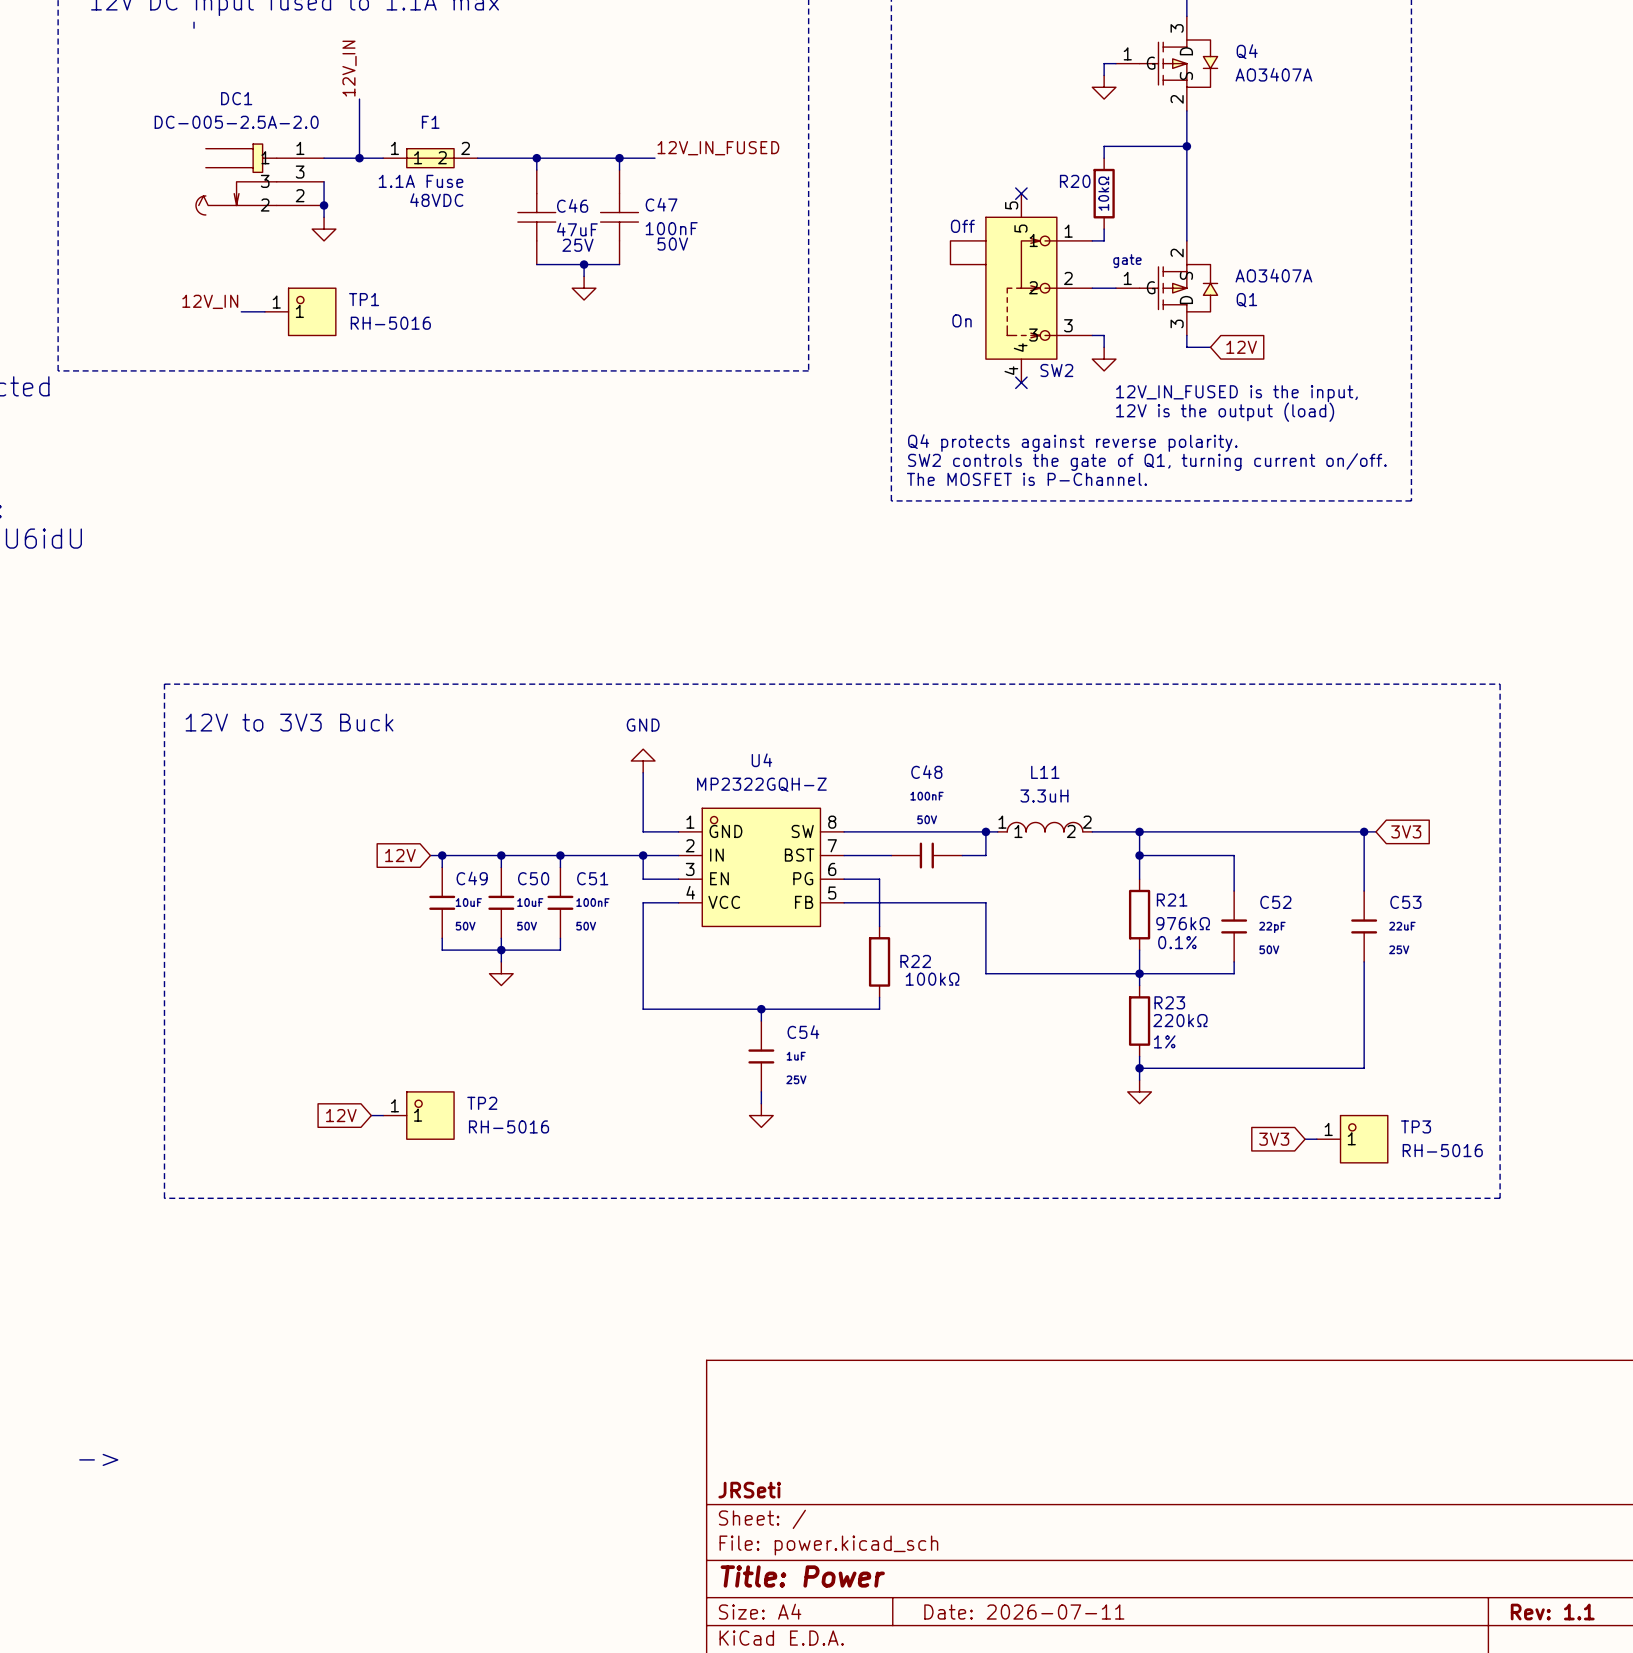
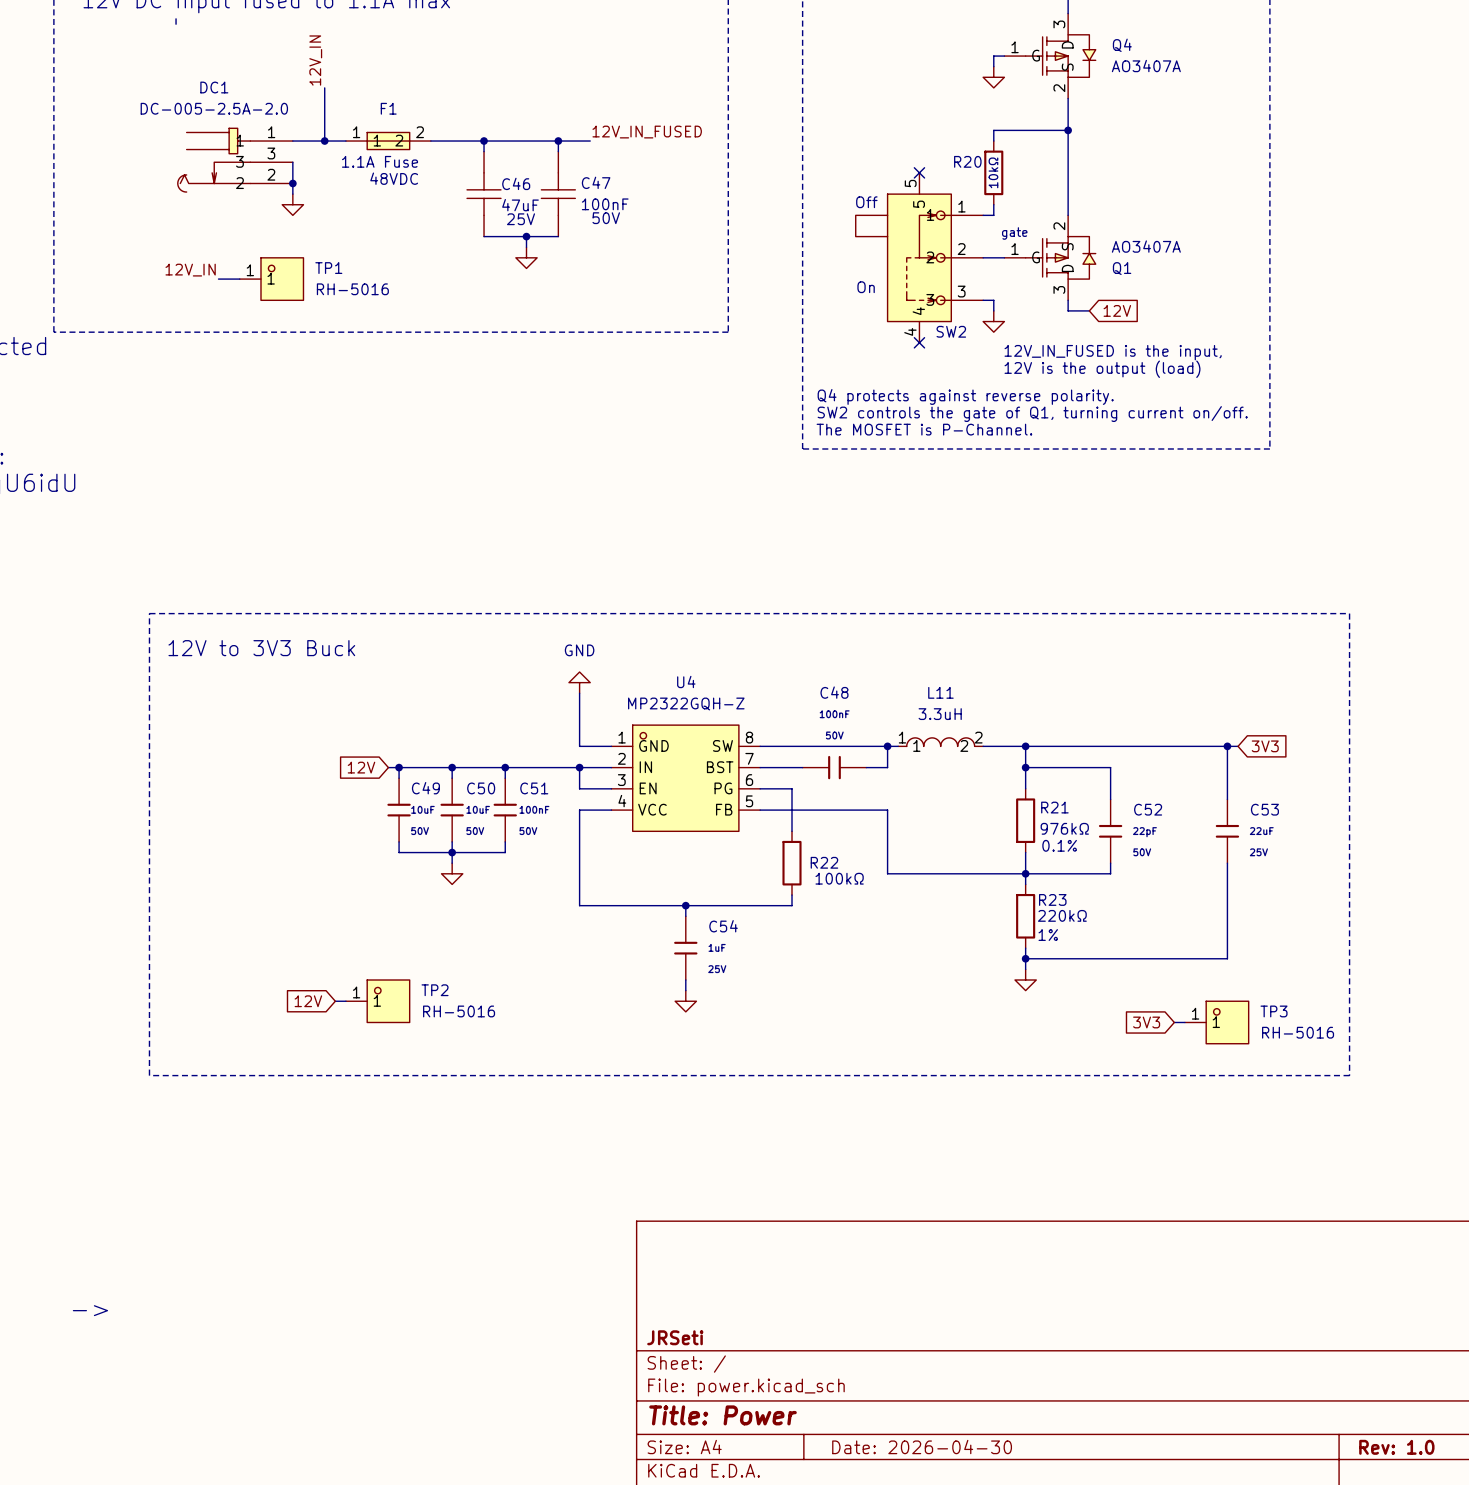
title block: Date: 2026-07-11 (1024, 1612) -> Date: 2026-04-30 (922, 1447)
title block: Rev: 1.1 (1552, 1612) -> Rev: 1.0 (1396, 1447)

